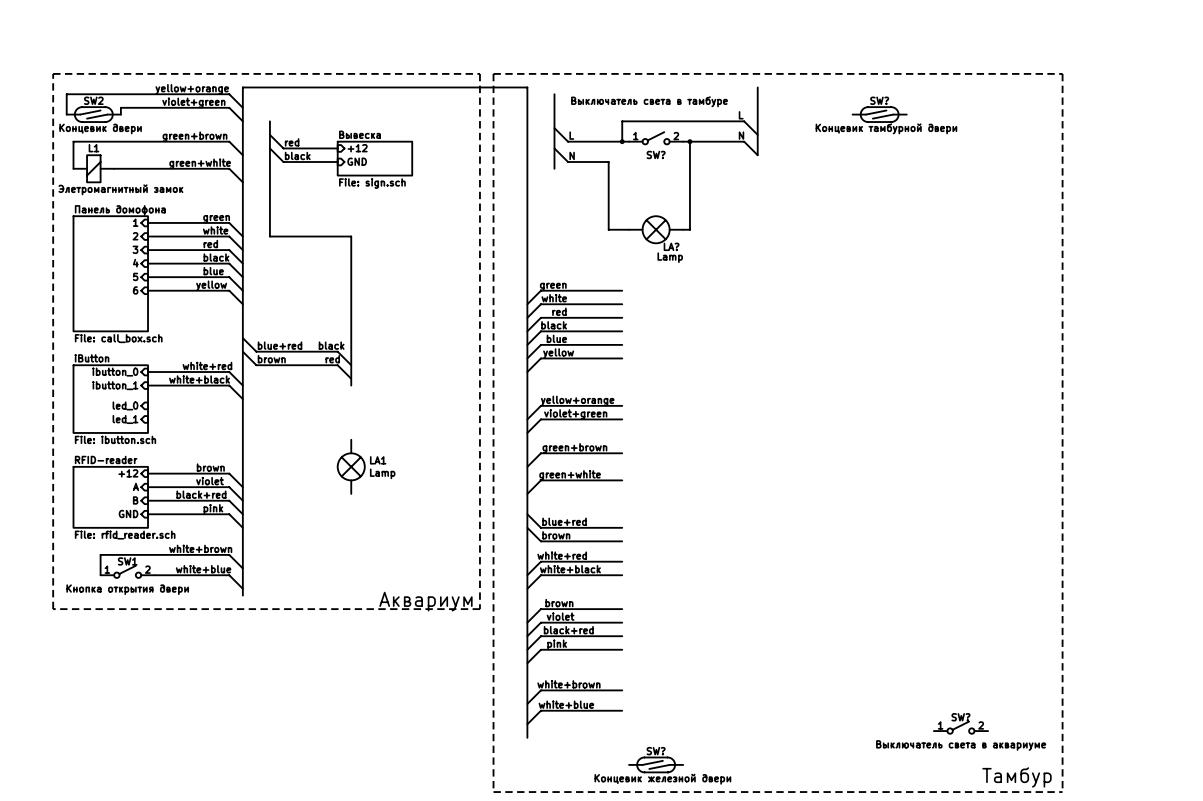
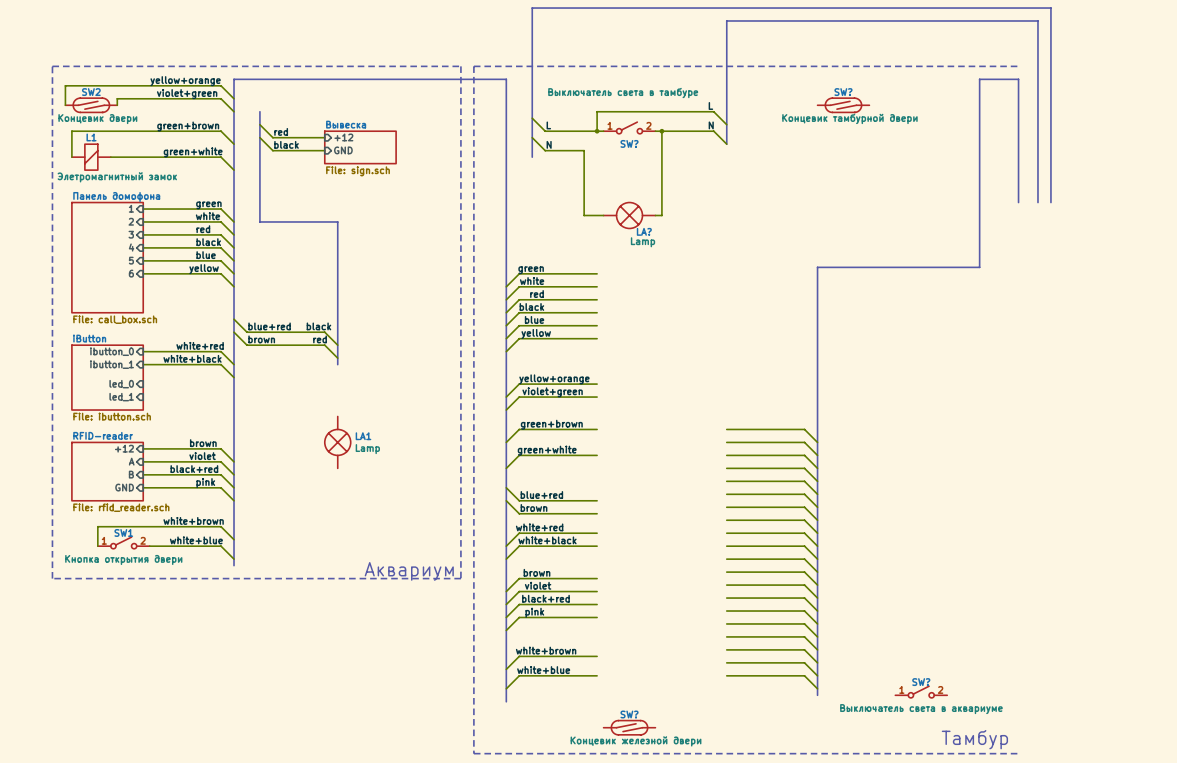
line: (1062, 73) (1062, 792) -> none
bus: none -> (726, 79) (726, 20) (1037, 20) (1037, 202)
bus: none -> (532, 85) (532, 8) (1050, 8) (1050, 202)
bus: none -> (1018, 202) (1018, 79) (979, 79) (979, 267) (817, 267) (817, 695)
wire: none -> (726, 429) (804, 429) (817, 442)
wire: none -> (726, 442) (804, 442) (817, 455)
wire: none -> (726, 455) (804, 455) (817, 468)
wire: none -> (726, 468) (804, 468) (817, 481)
wire: none -> (726, 481) (804, 481) (817, 494)
wire: none -> (726, 494) (804, 494) (817, 507)
wire: none -> (726, 507) (804, 507) (817, 520)
wire: none -> (726, 520) (804, 520) (817, 533)
wire: none -> (726, 533) (804, 533) (817, 546)
wire: none -> (726, 546) (804, 546) (817, 559)
wire: none -> (726, 559) (804, 559) (817, 572)
wire: none -> (726, 572) (804, 572) (817, 585)
wire: none -> (726, 585) (804, 585) (817, 598)
wire: none -> (726, 598) (804, 598) (817, 611)
wire: none -> (726, 611) (804, 611) (817, 623)
wire: none -> (726, 623) (804, 623) (817, 636)
wire: none -> (726, 636) (804, 636) (817, 649)
wire: none -> (726, 649) (804, 649) (817, 662)
wire: none -> (726, 662) (804, 662) (817, 675)
wire: none -> (726, 675) (804, 675) (817, 688)

